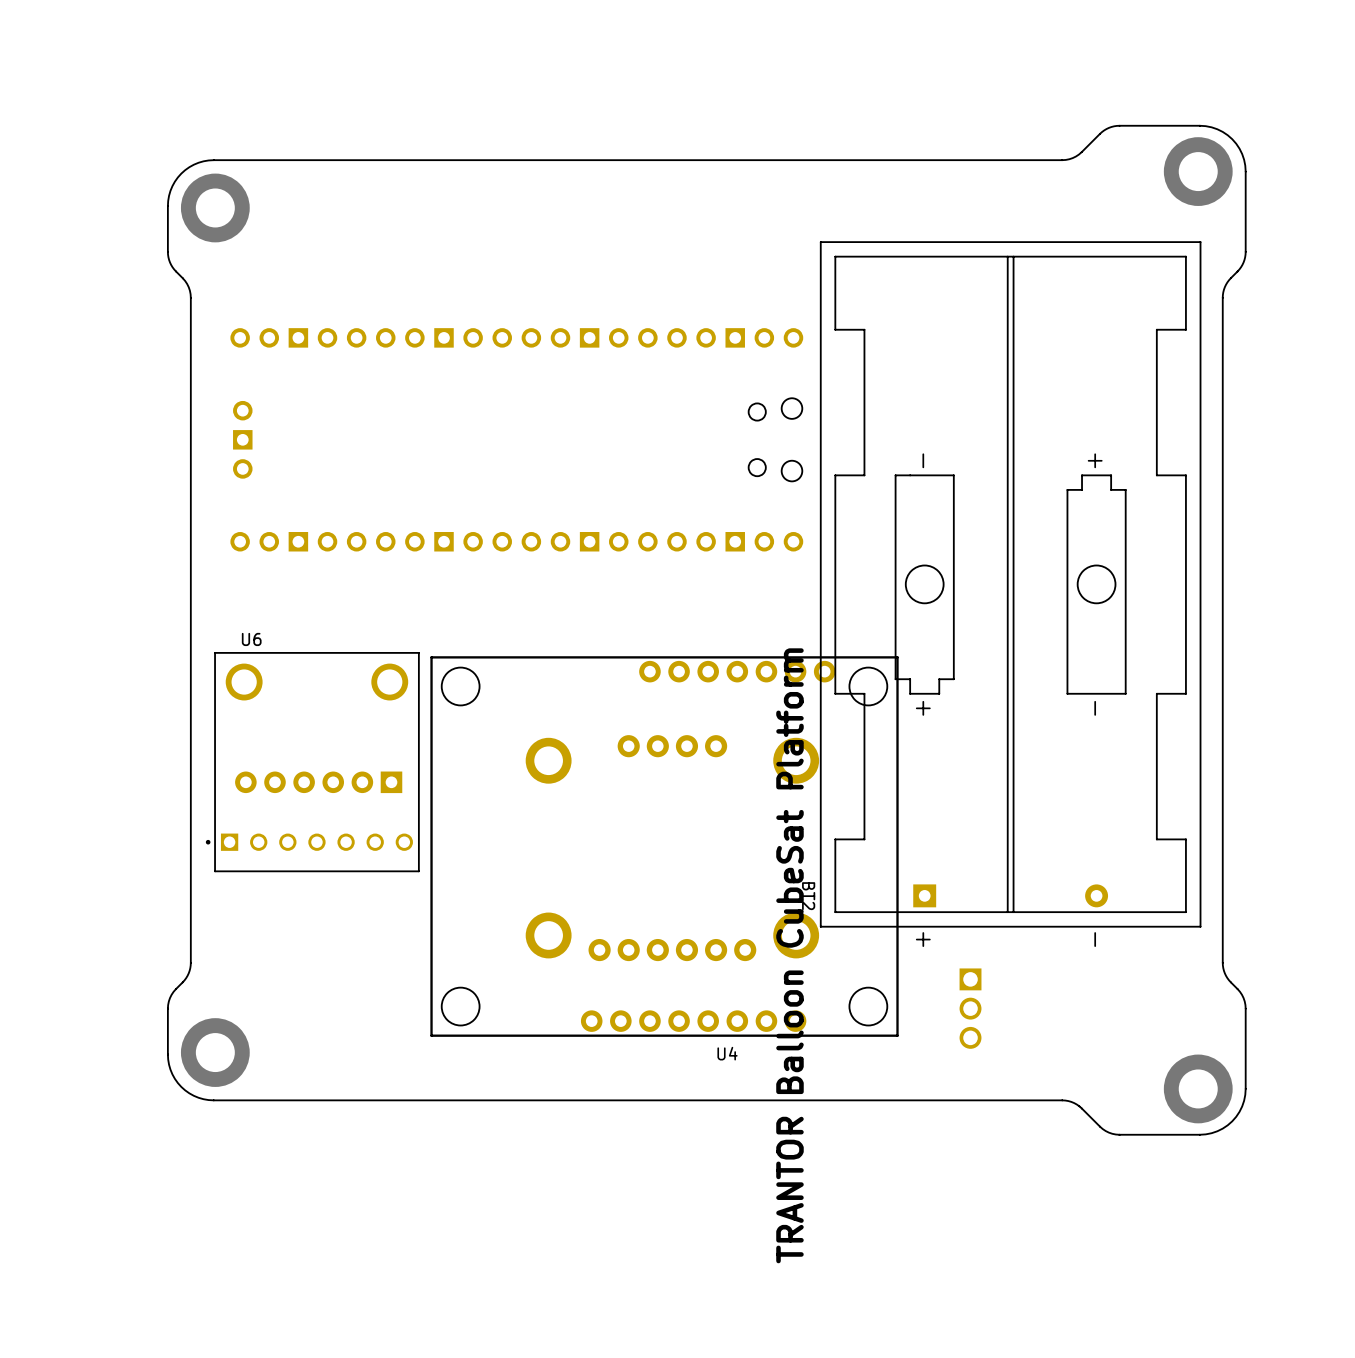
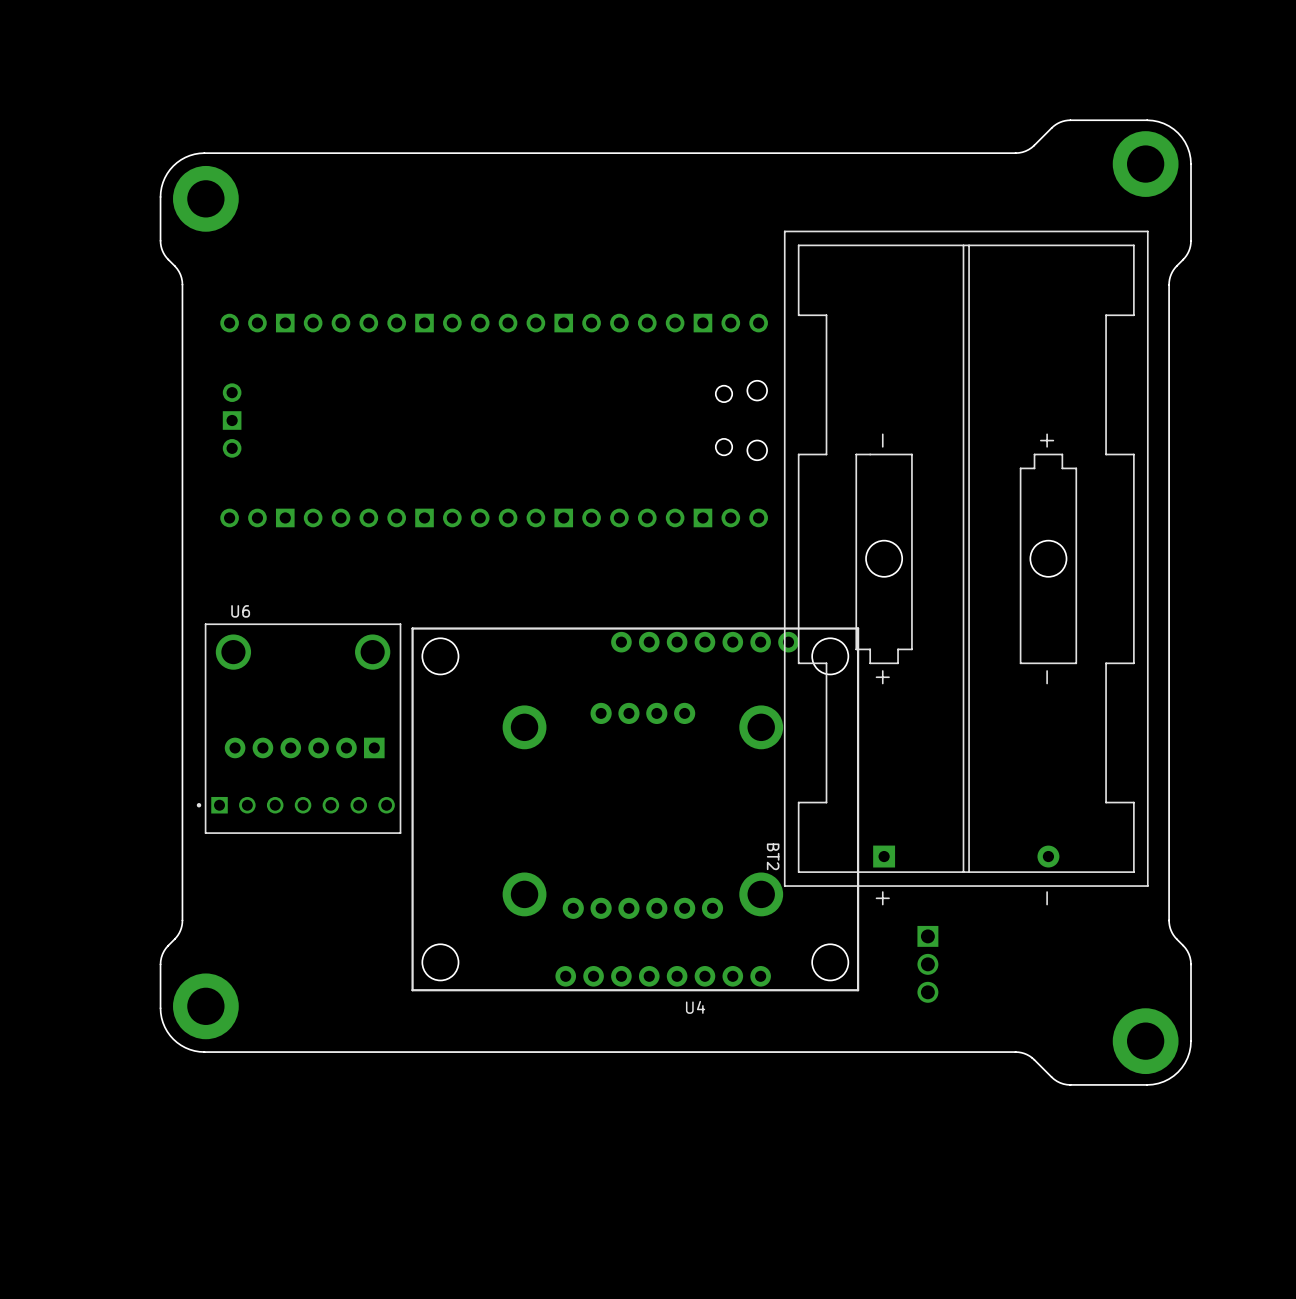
text: TRANTOR Balloon CubeSat Platform (789, 955) -> none

